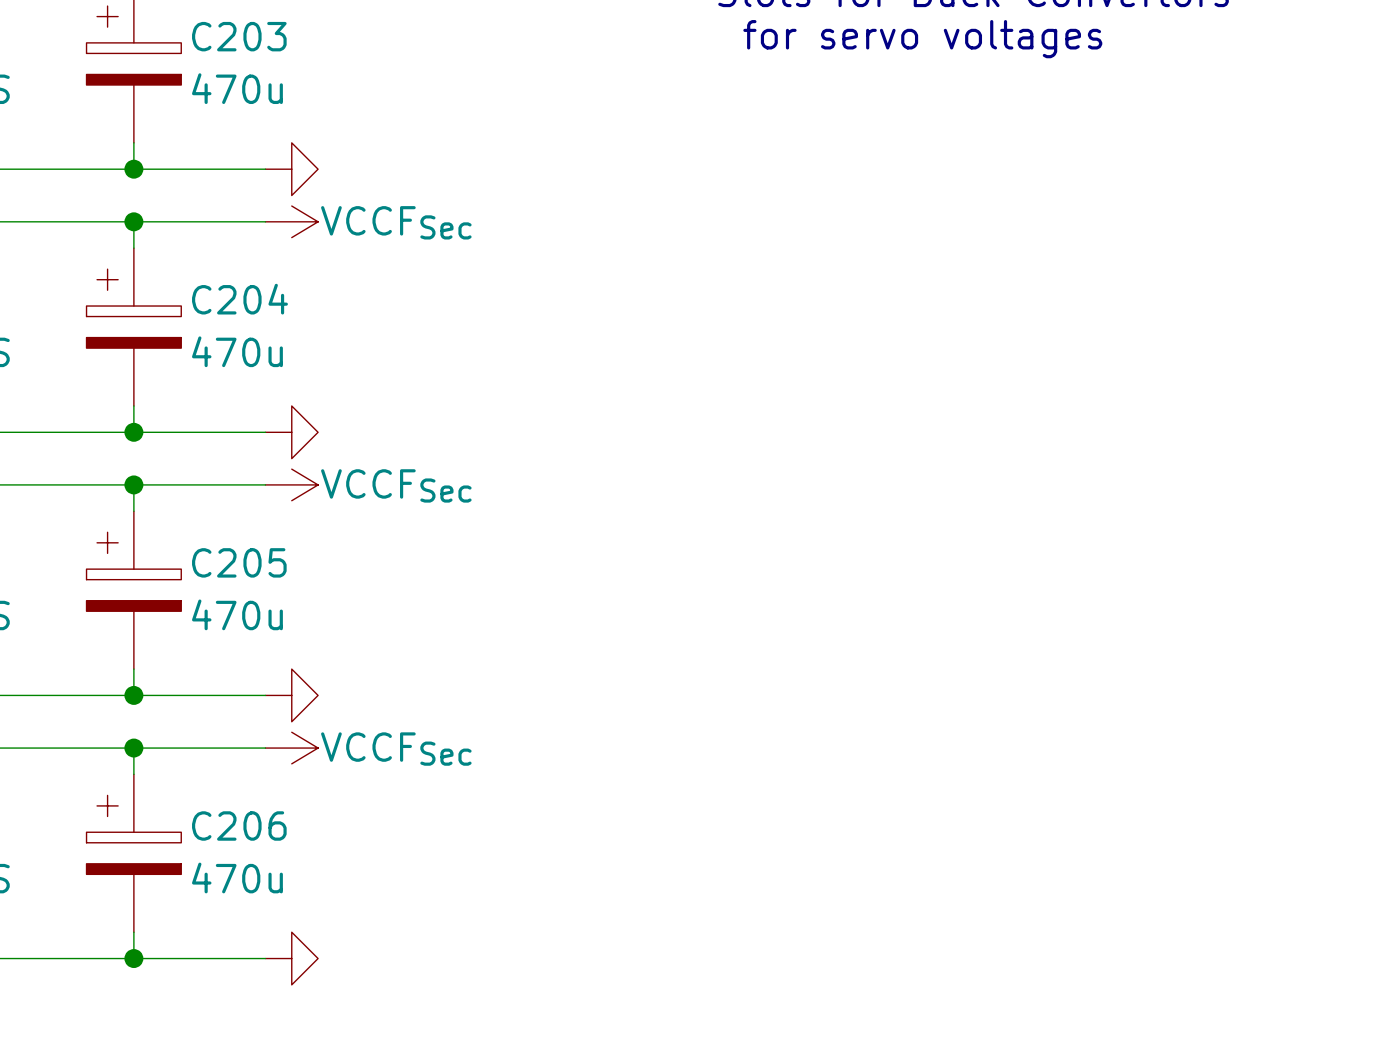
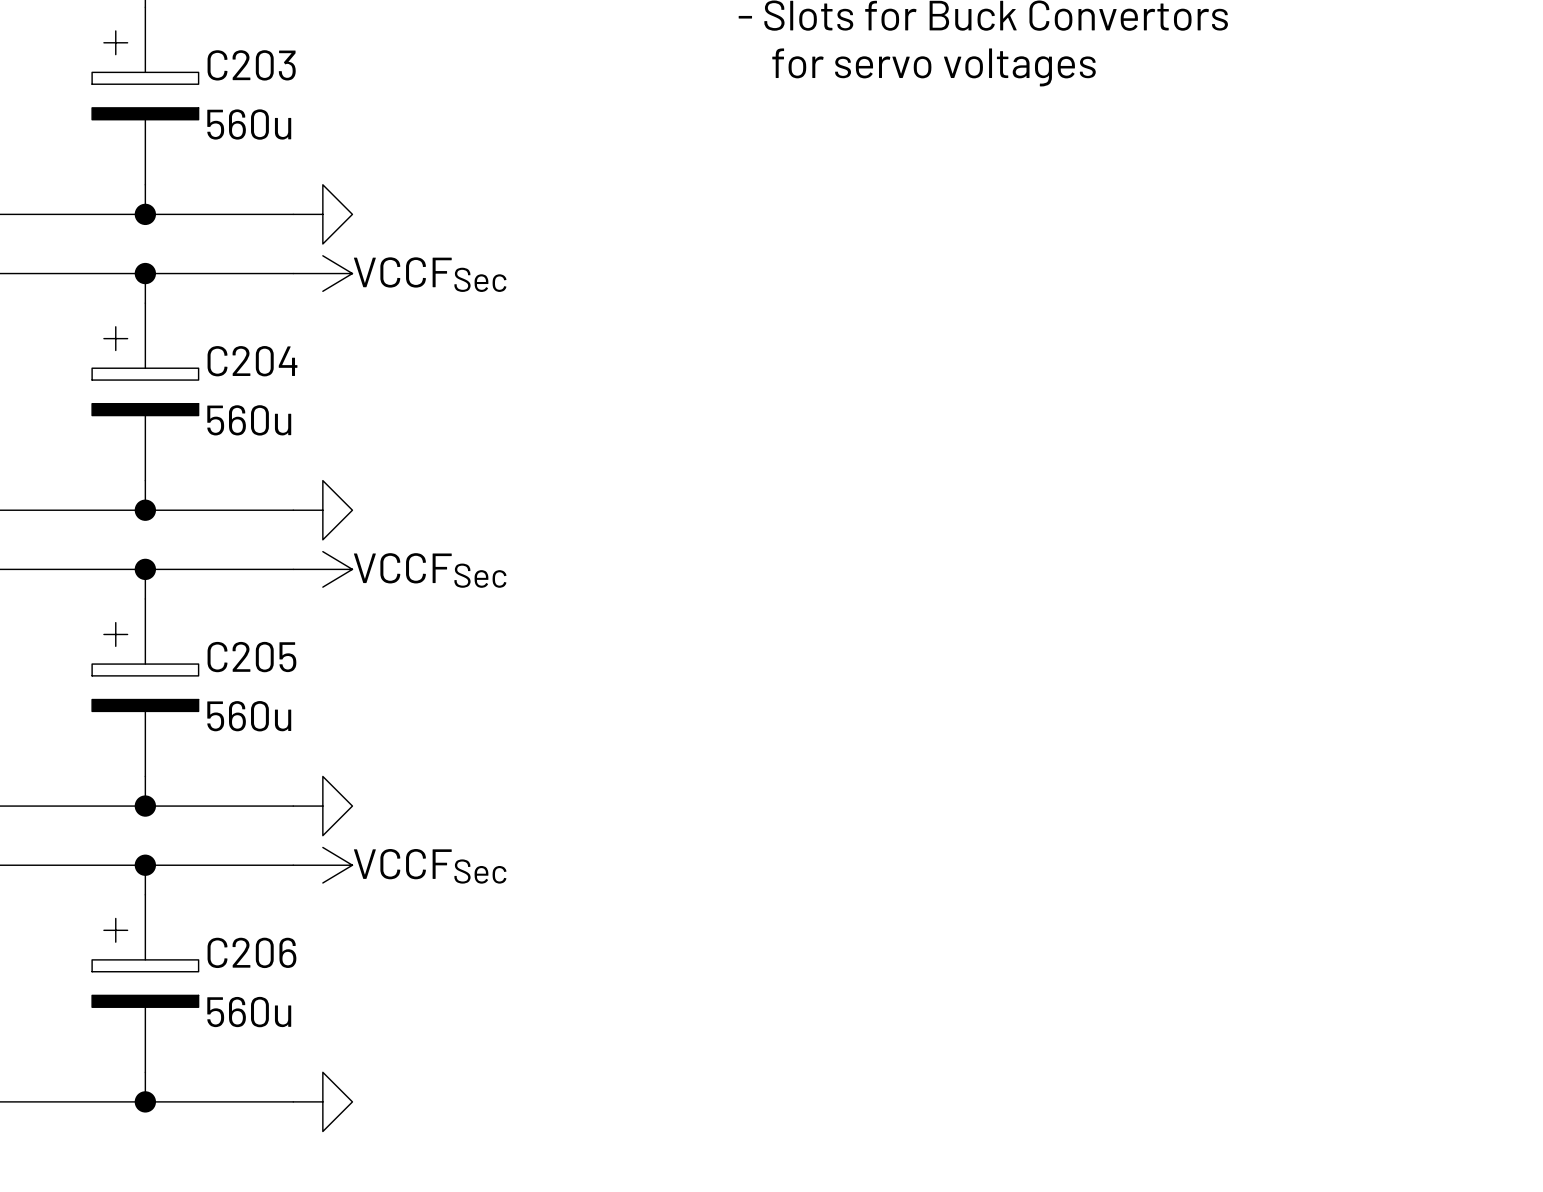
C203 value: 470u (237, 88) -> 560u (249, 124)
C204 value: 470u (237, 351) -> 560u (249, 420)
C205 value: 470u (237, 614) -> 560u (249, 716)
C206 value: 470u (237, 878) -> 560u (249, 1012)

